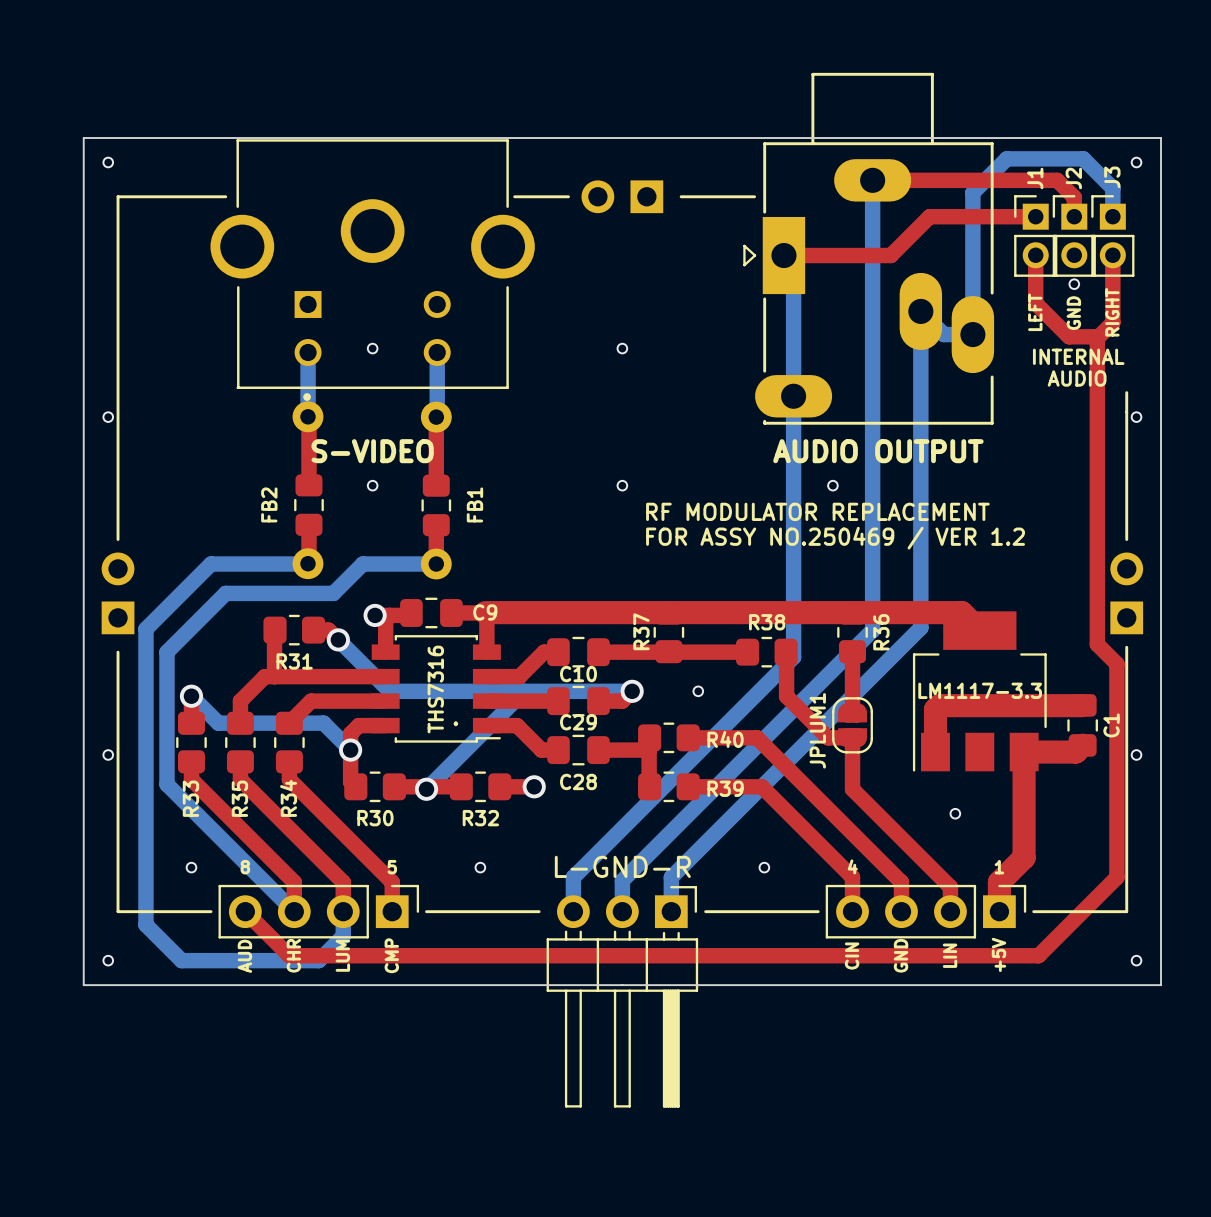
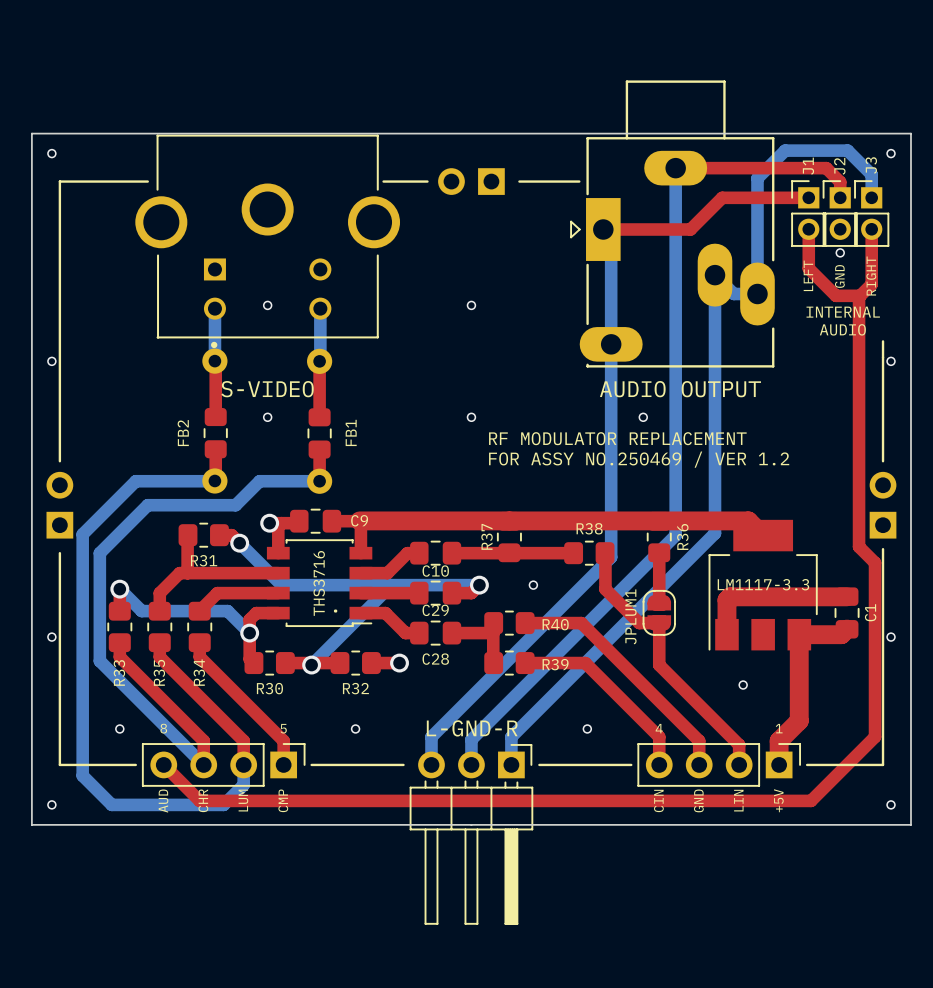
THS7316 name: THS7316 (435, 689) -> THS3716 (319, 583)

